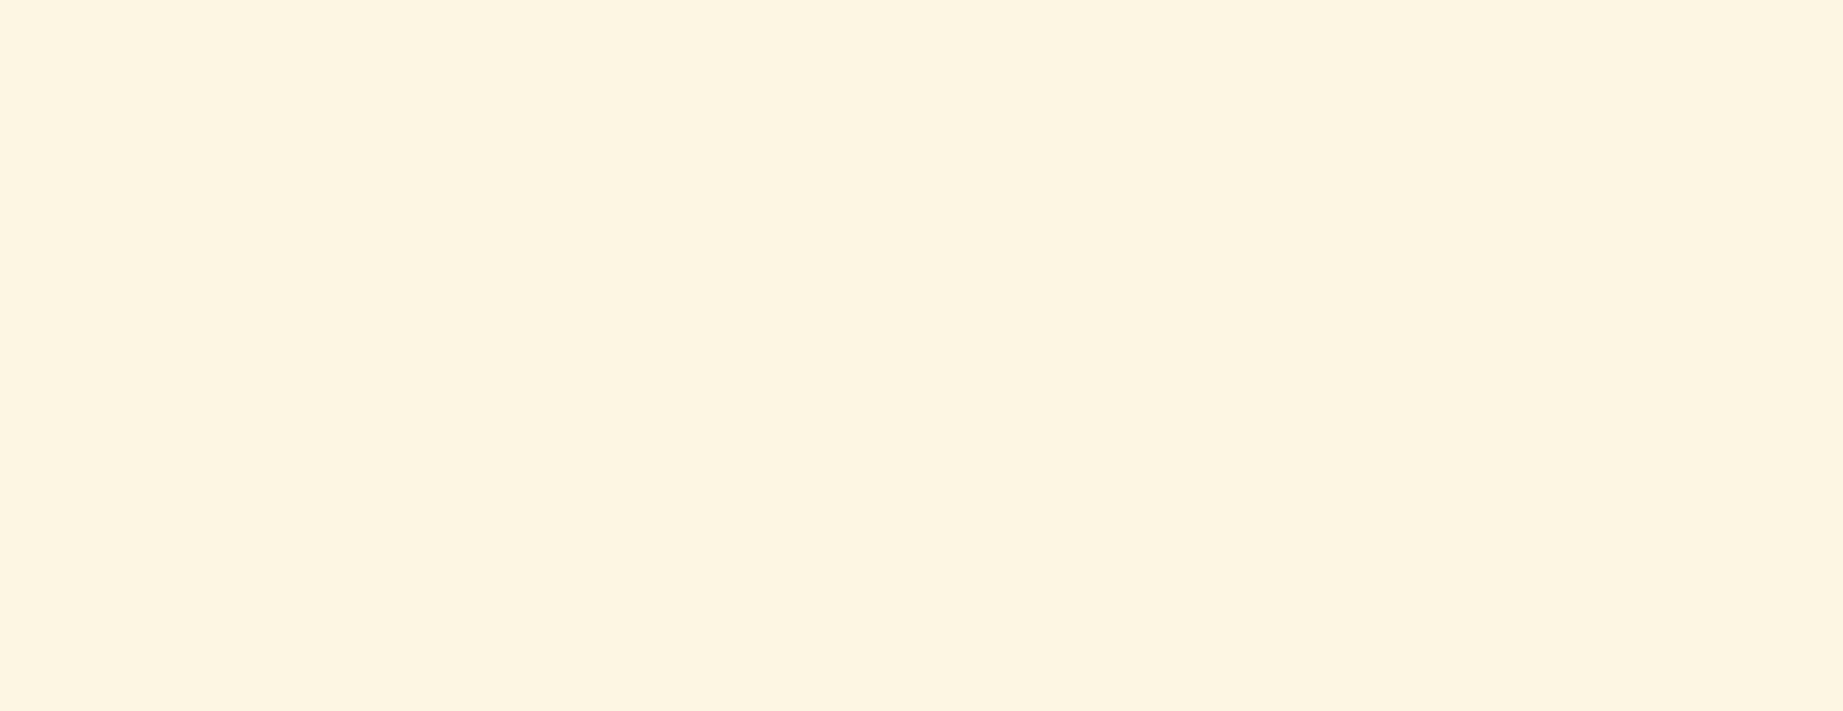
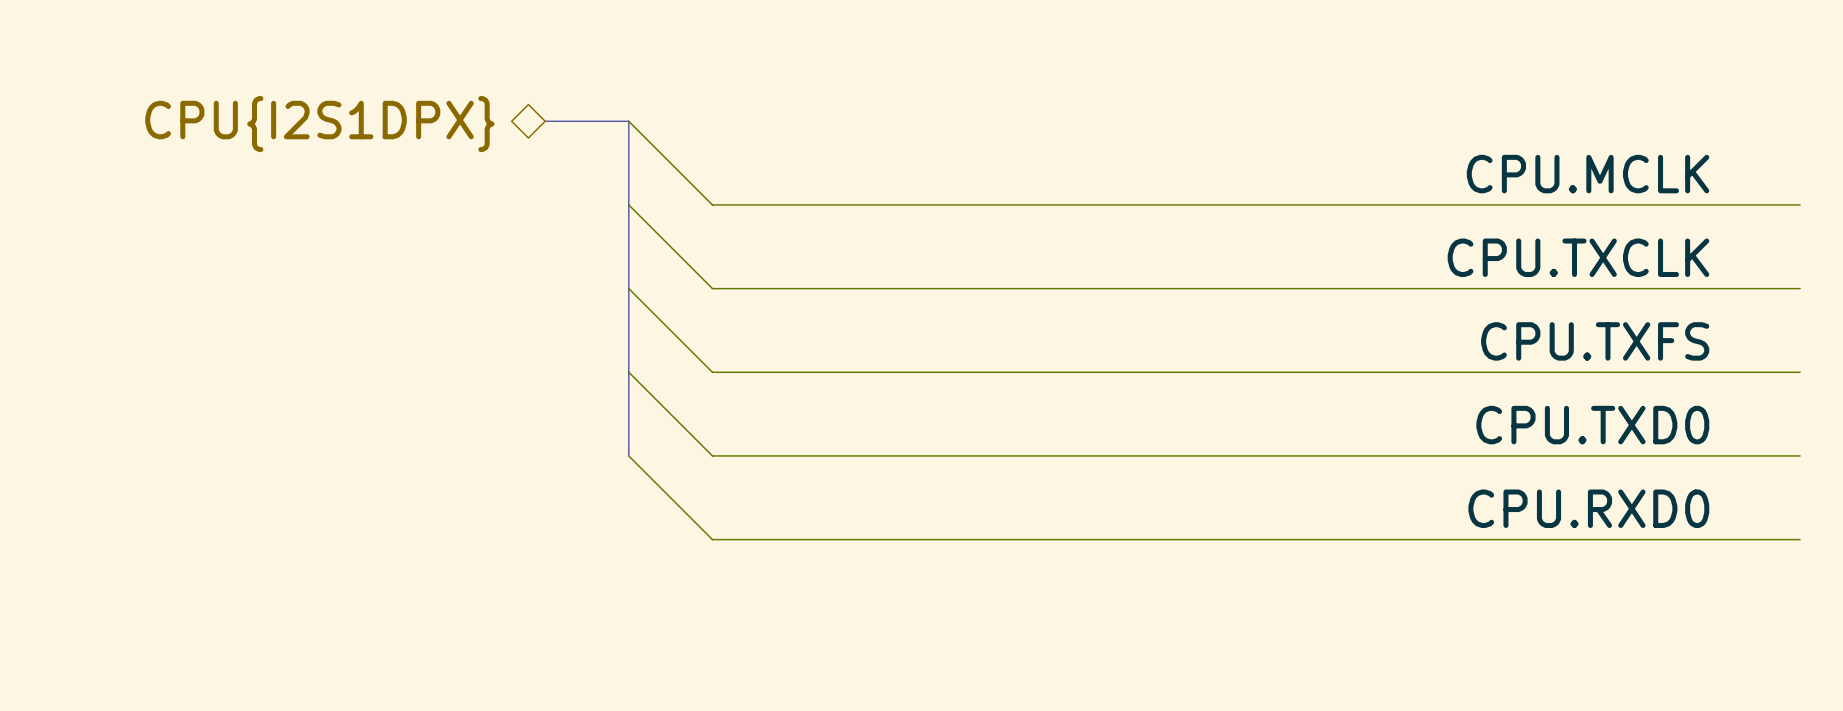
bus: none -> (545, 121) (628, 121) (628, 455)
wire: none -> (628, 121) (712, 204) (1800, 204)
hierarchical label: none -> CPU{I2S1DPX} (319, 124)
label: none -> CPU.MCLK (1588, 174)
wire: none -> (628, 204) (712, 288) (1800, 288)
label: none -> CPU.TXCLK (1578, 257)
wire: none -> (628, 288) (712, 372) (1800, 372)
label: none -> CPU.TXFS (1595, 341)
wire: none -> (628, 372) (712, 455) (1800, 455)
label: none -> CPU.TXD0 (1592, 425)
wire: none -> (628, 455) (712, 539) (1800, 539)
label: none -> CPU.RXD0 (1588, 508)

